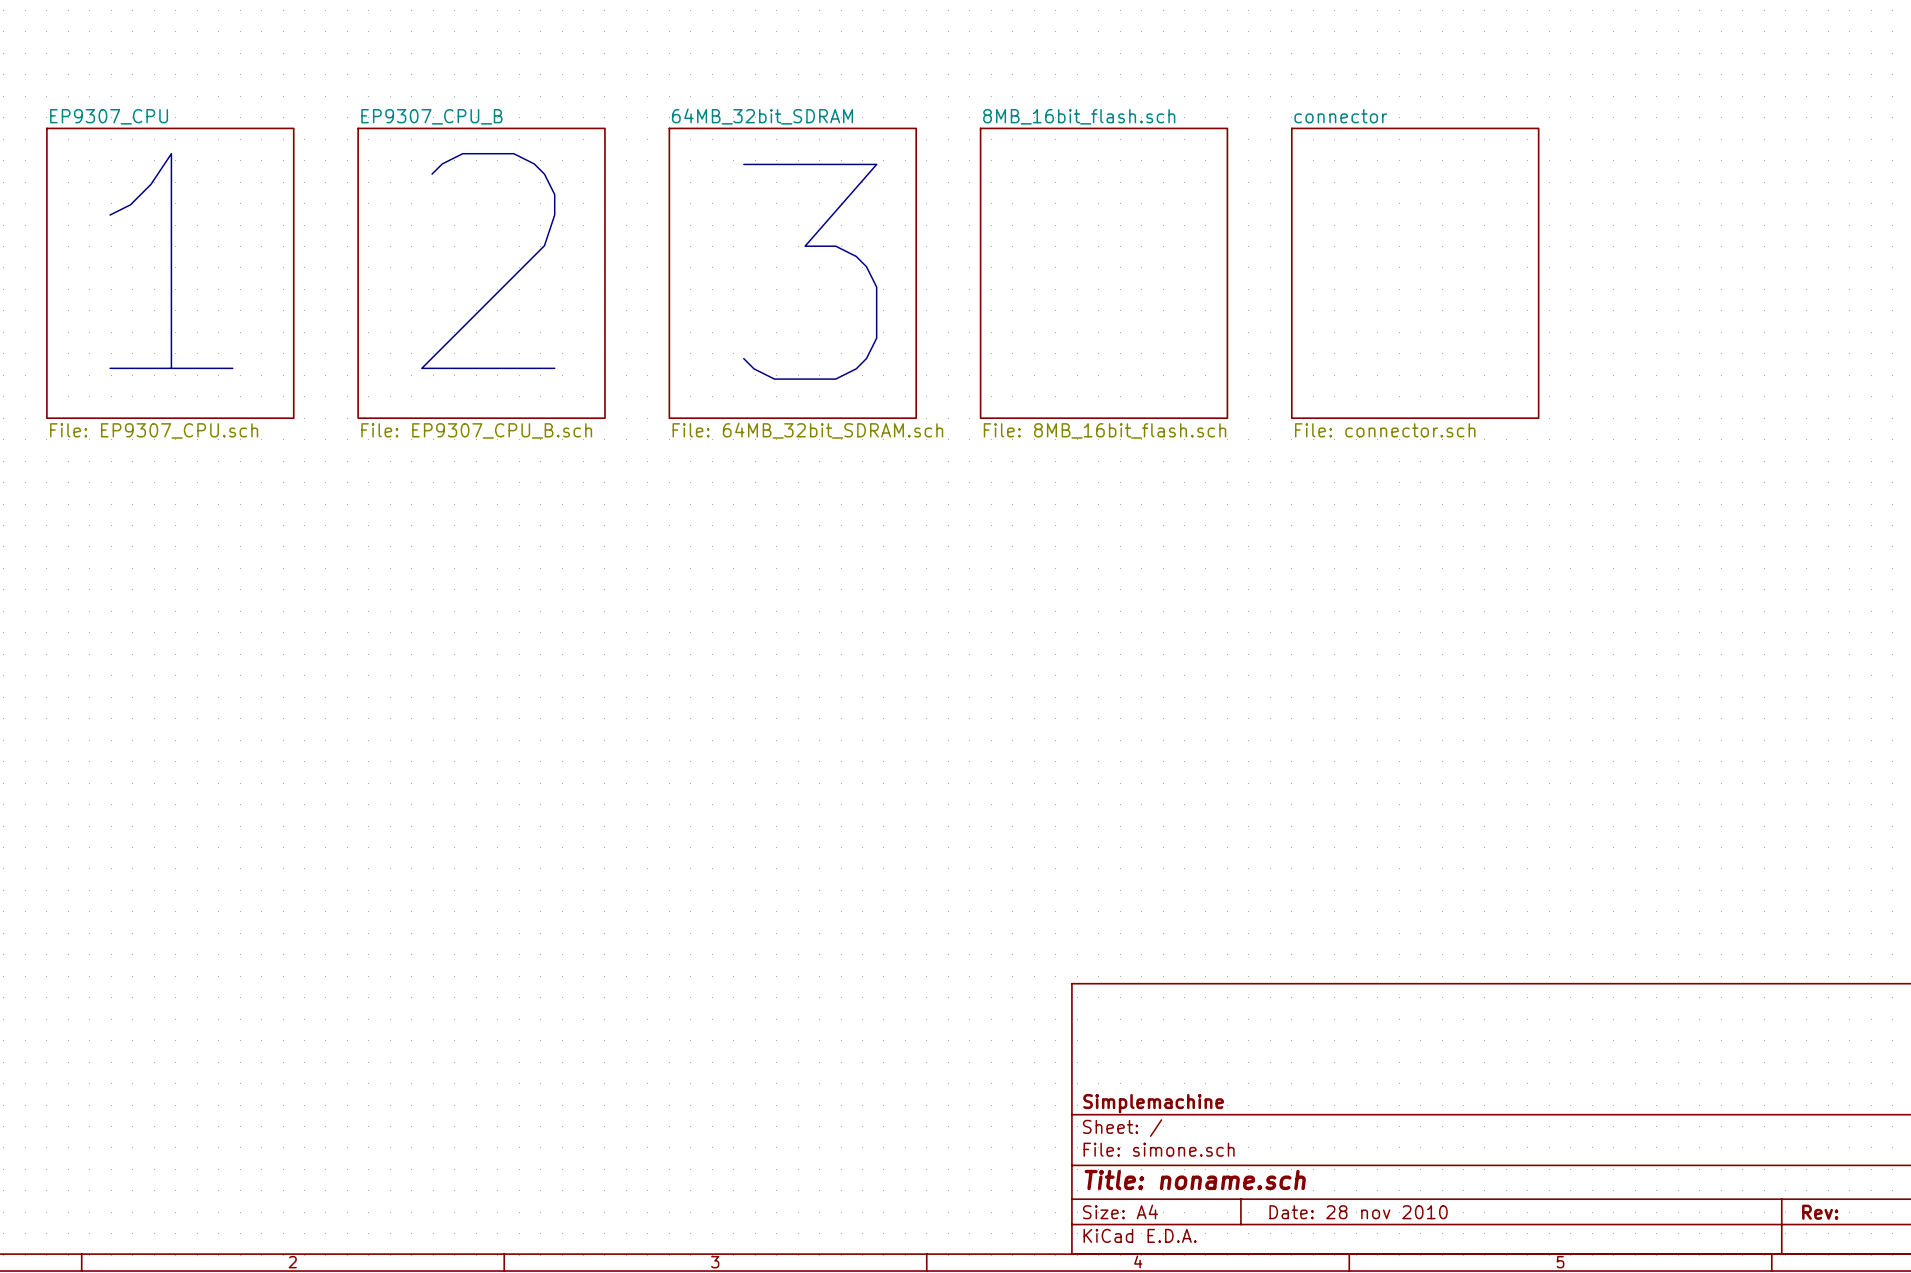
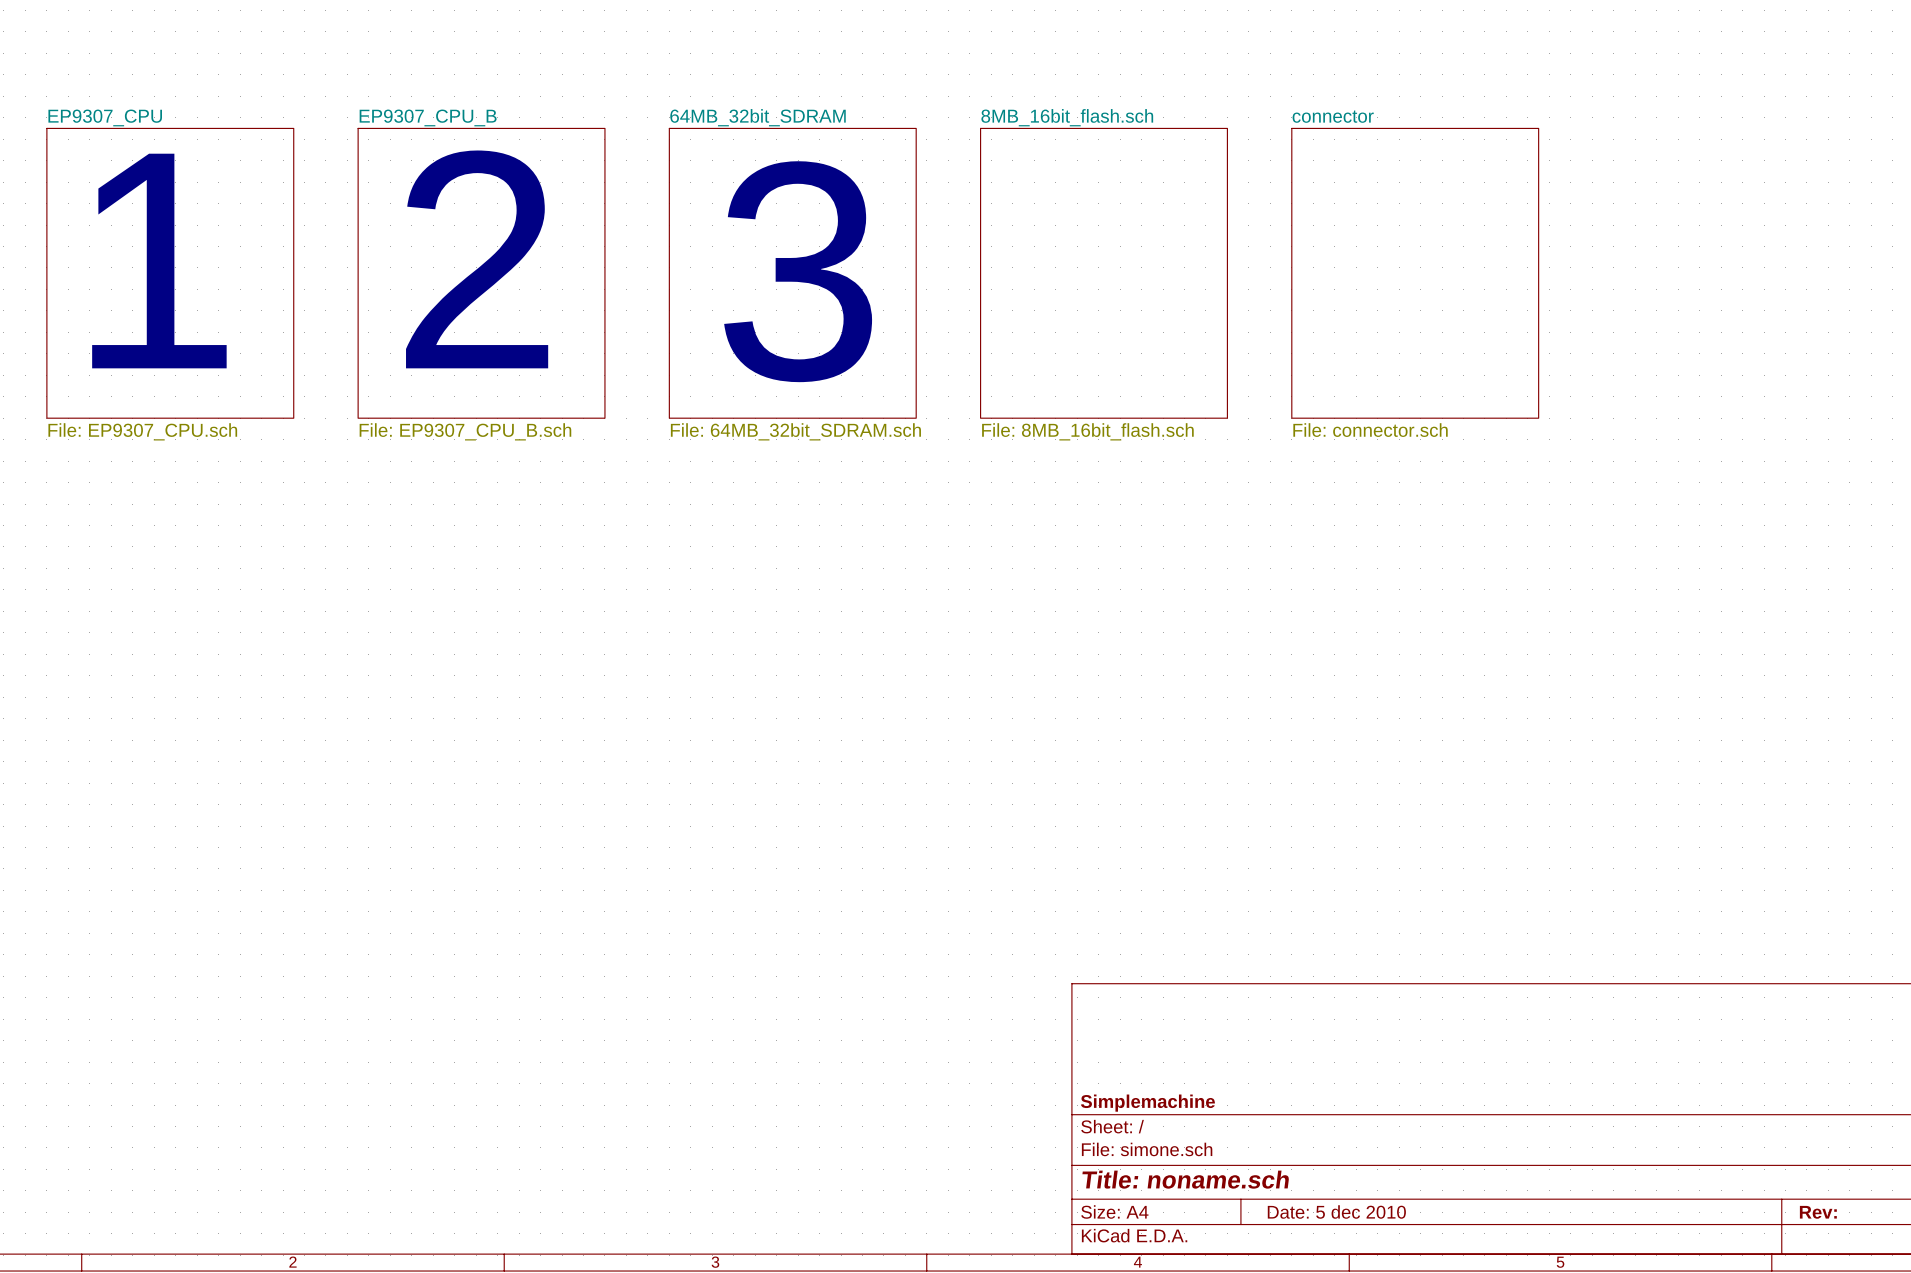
title block: Date: 28 nov 2010 (1358, 1212) -> Date: 5 dec 2010 (1336, 1211)

